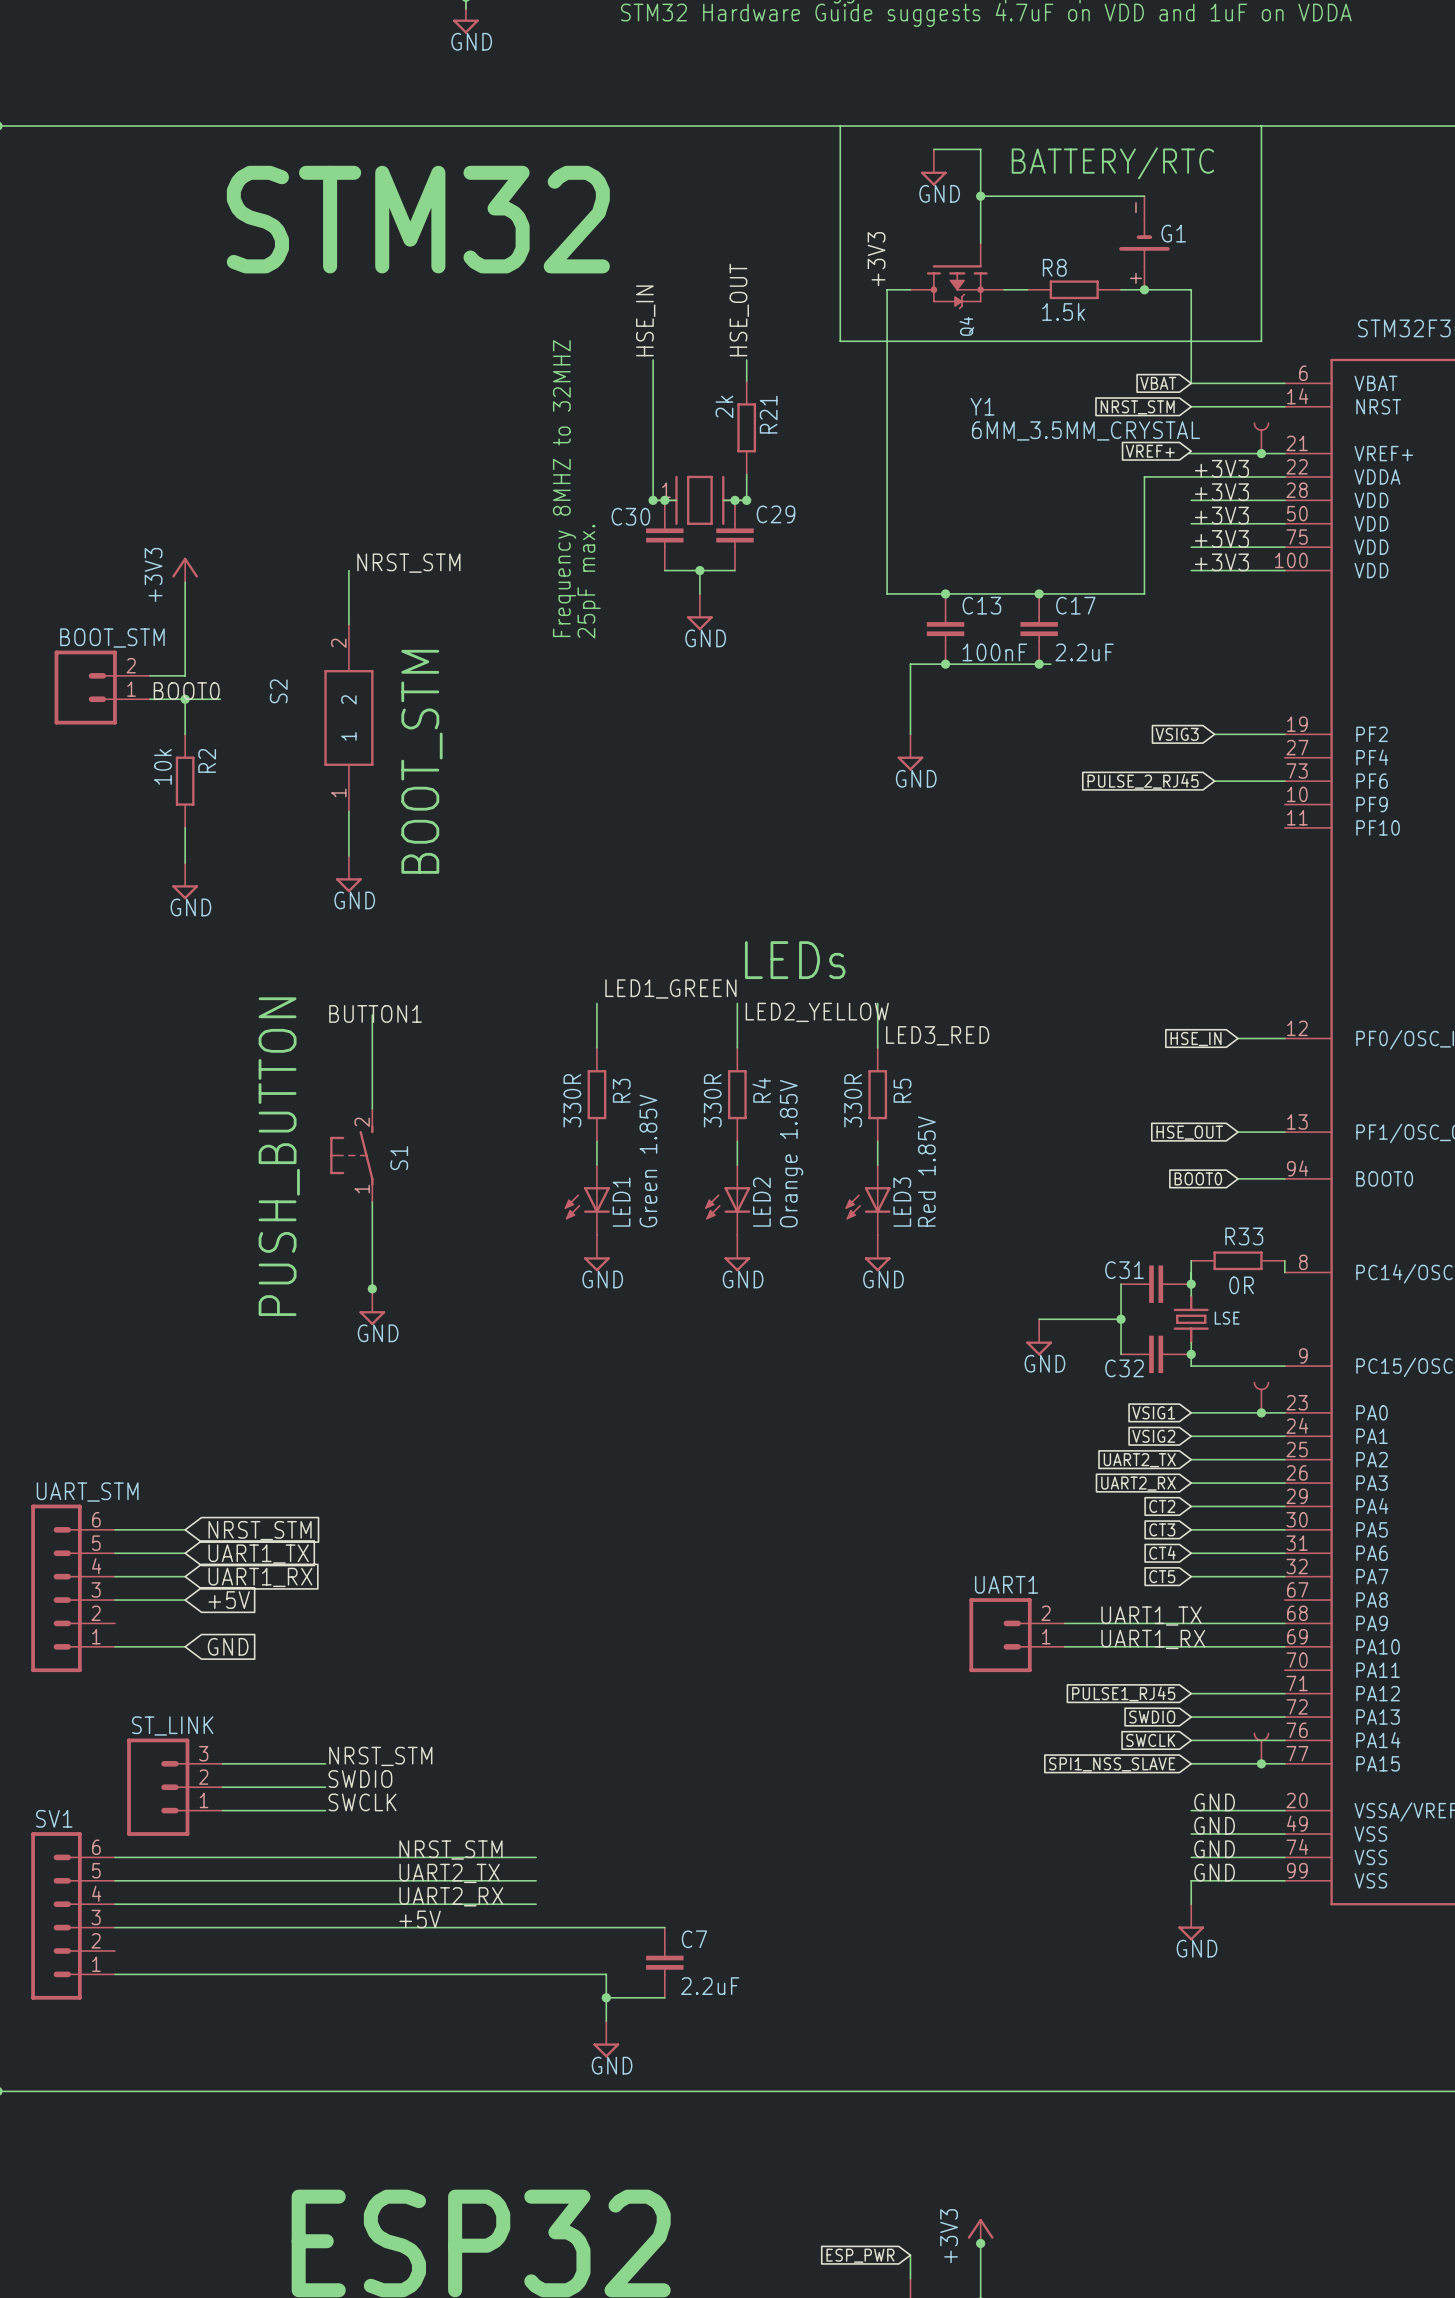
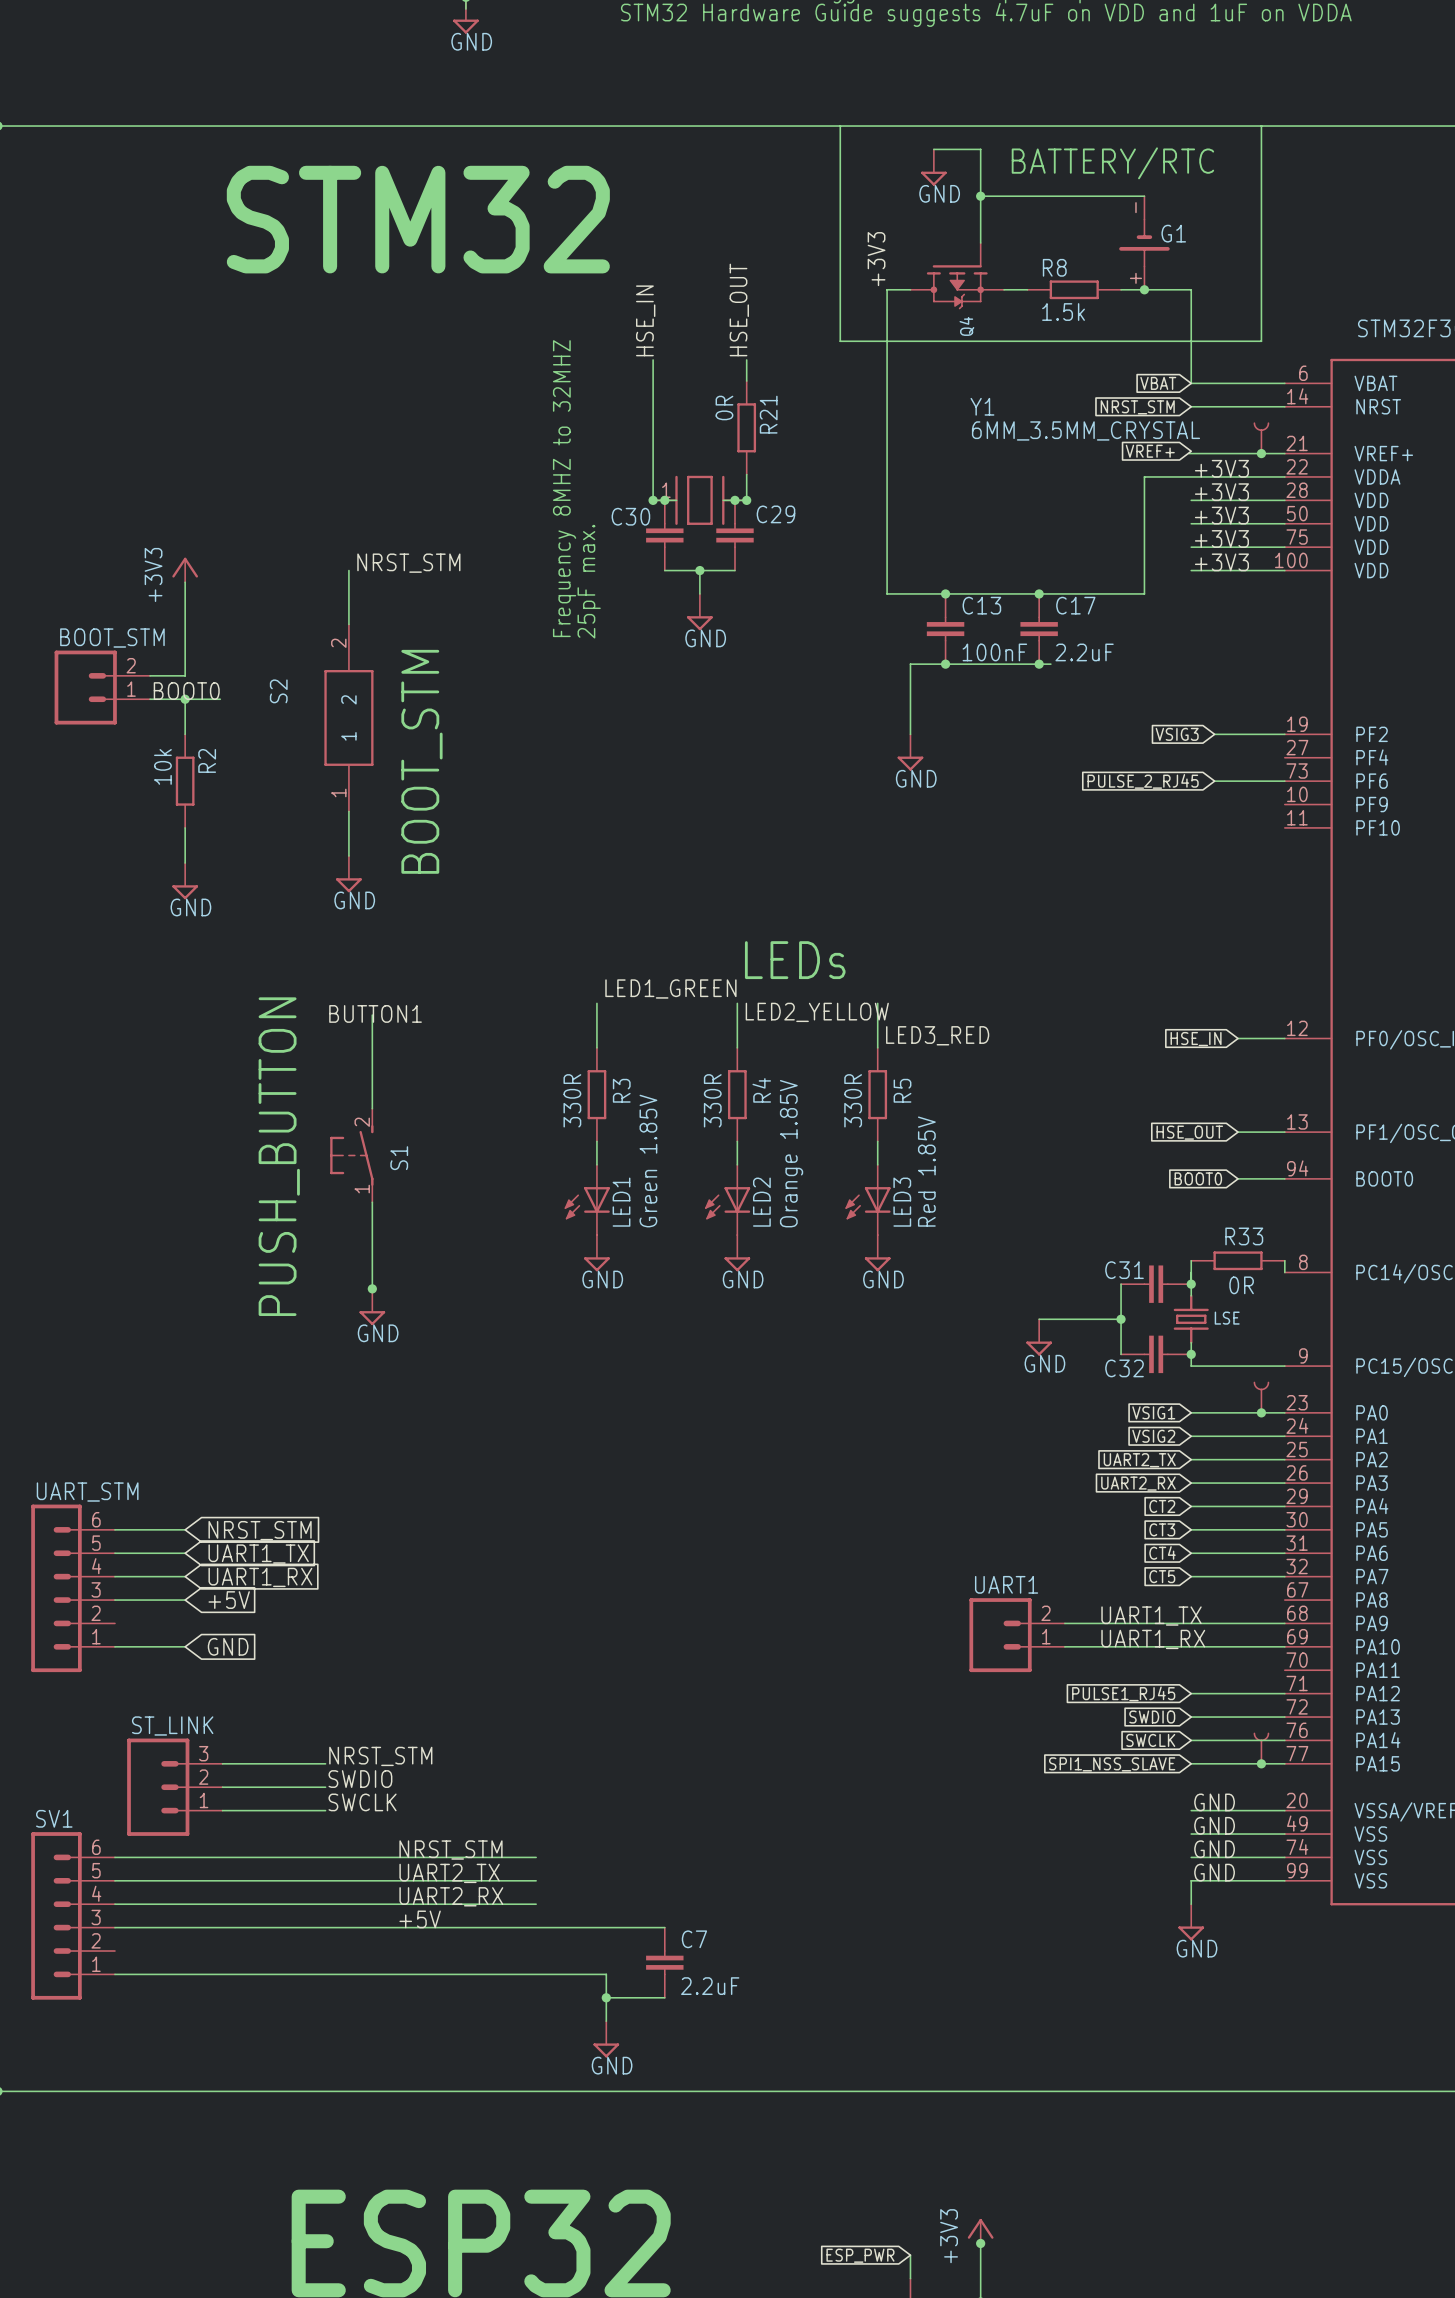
R21 value: 2k (724, 406) -> 0R (724, 407)

